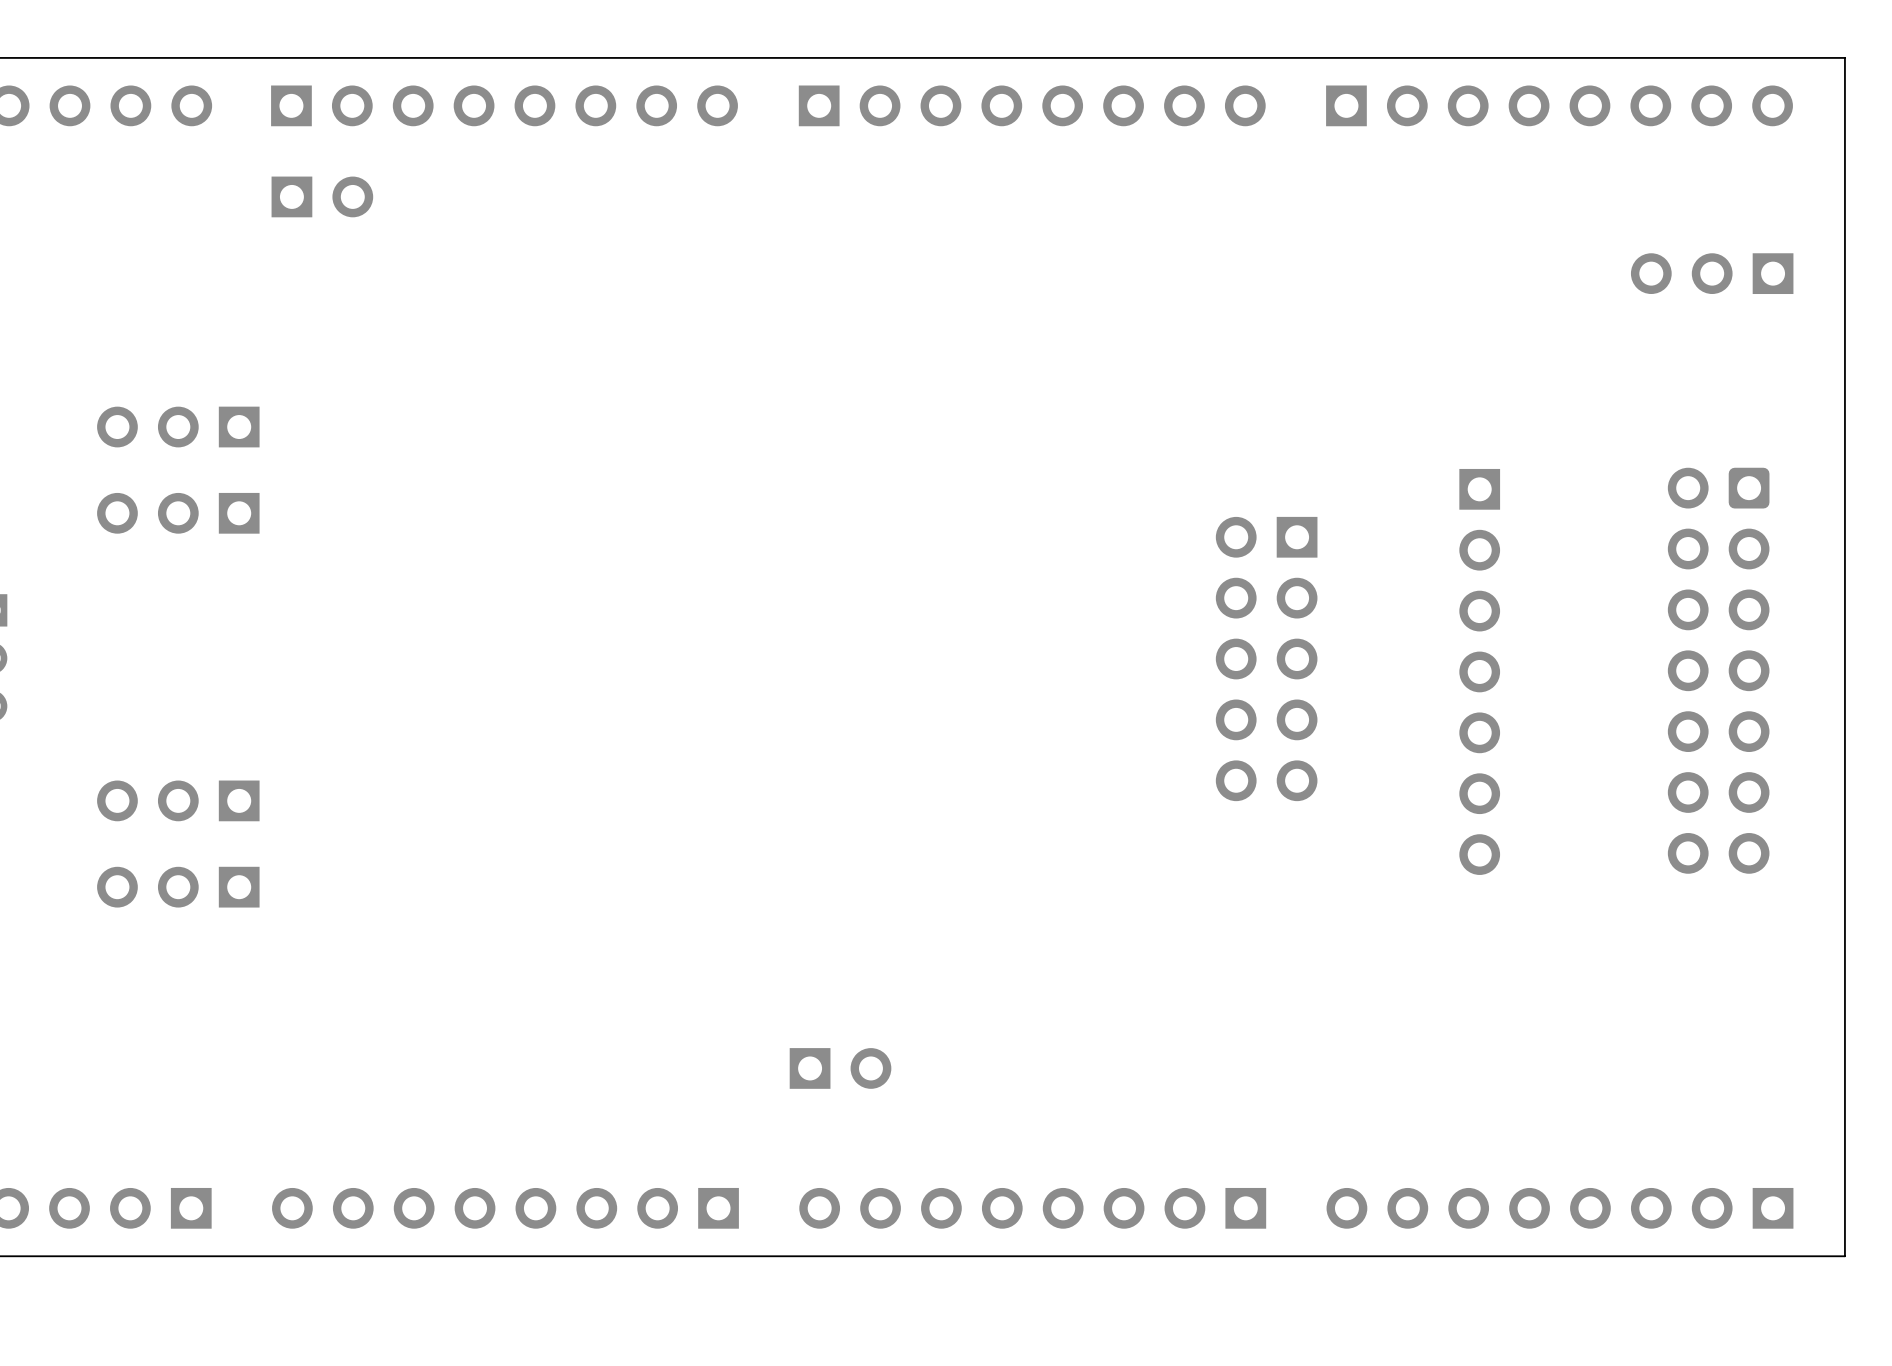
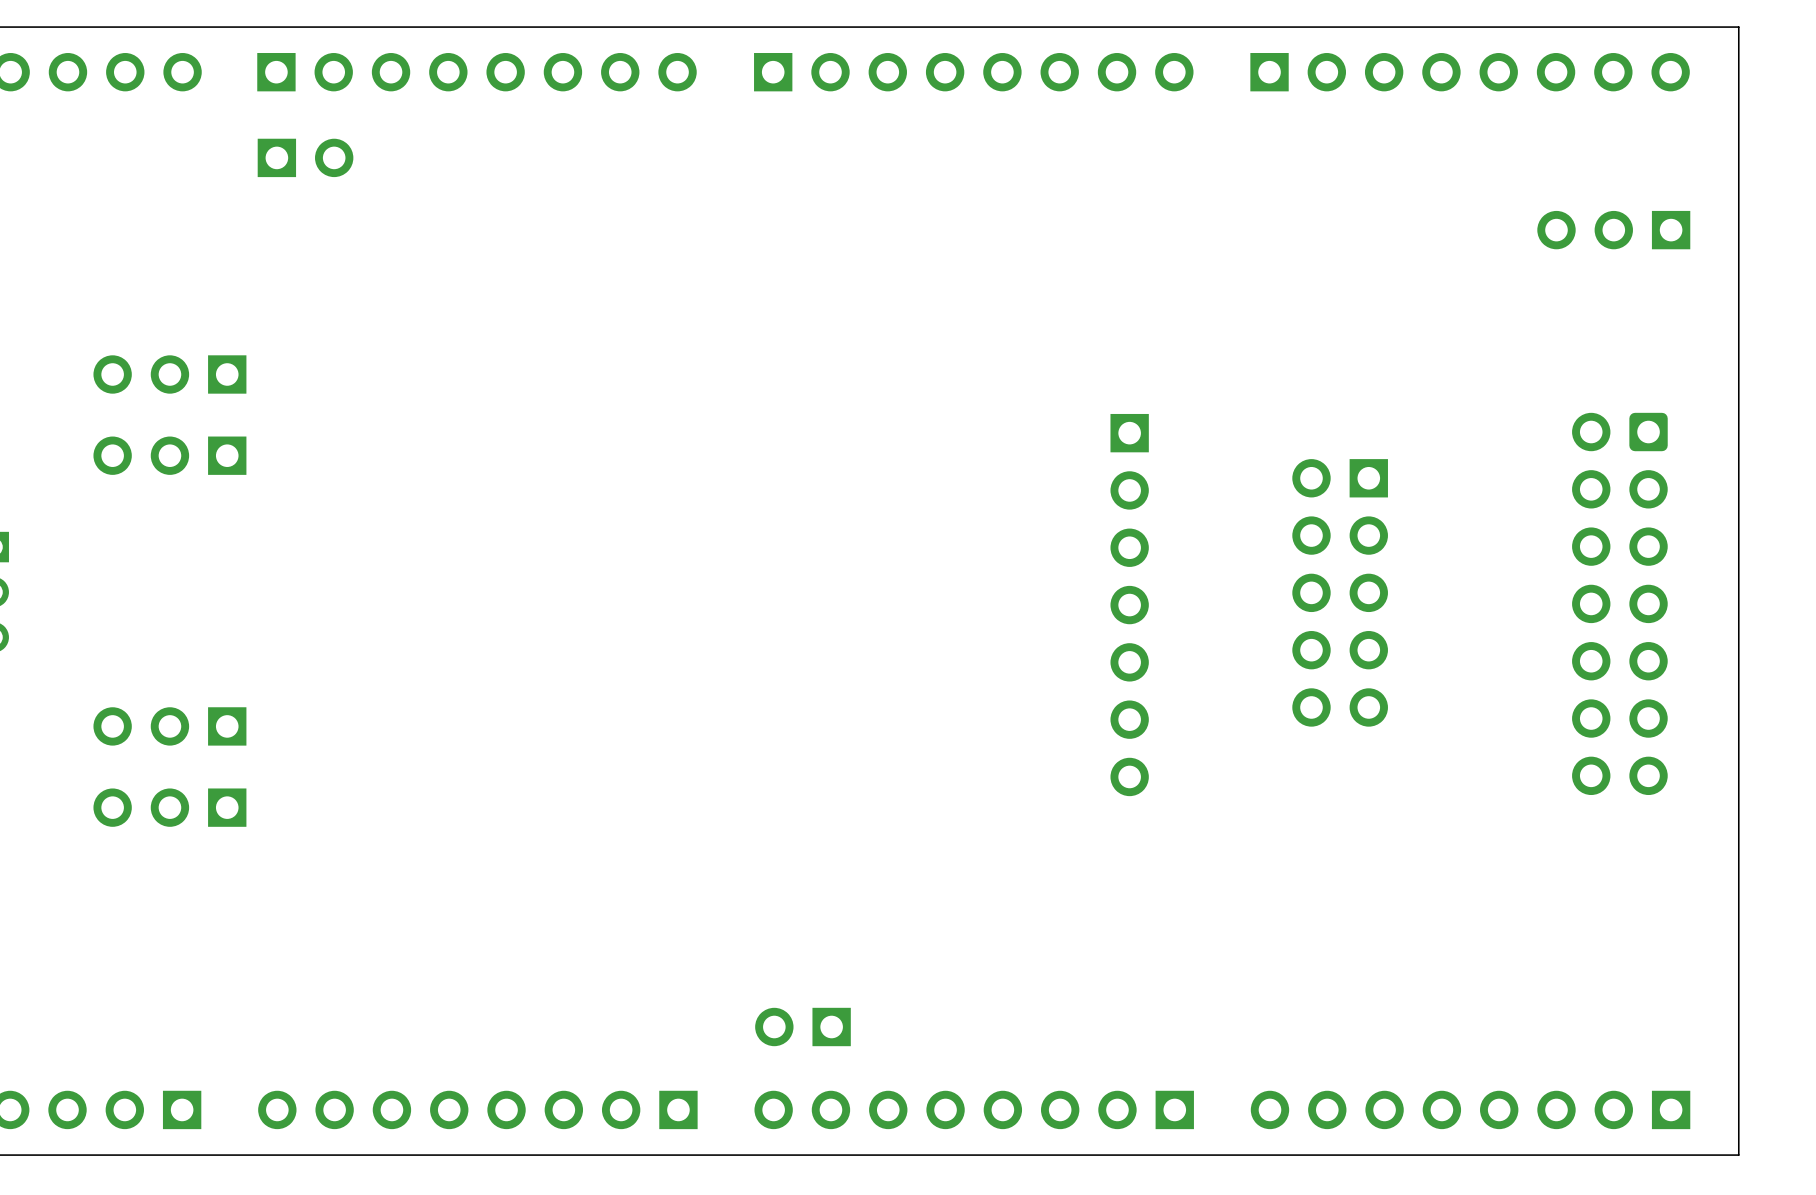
part position: (1266, 659) -> (1340, 592)
part position: (1479, 671) -> (1129, 605)
part rotation: 0° (840, 1068) -> 180° (802, 1027)

